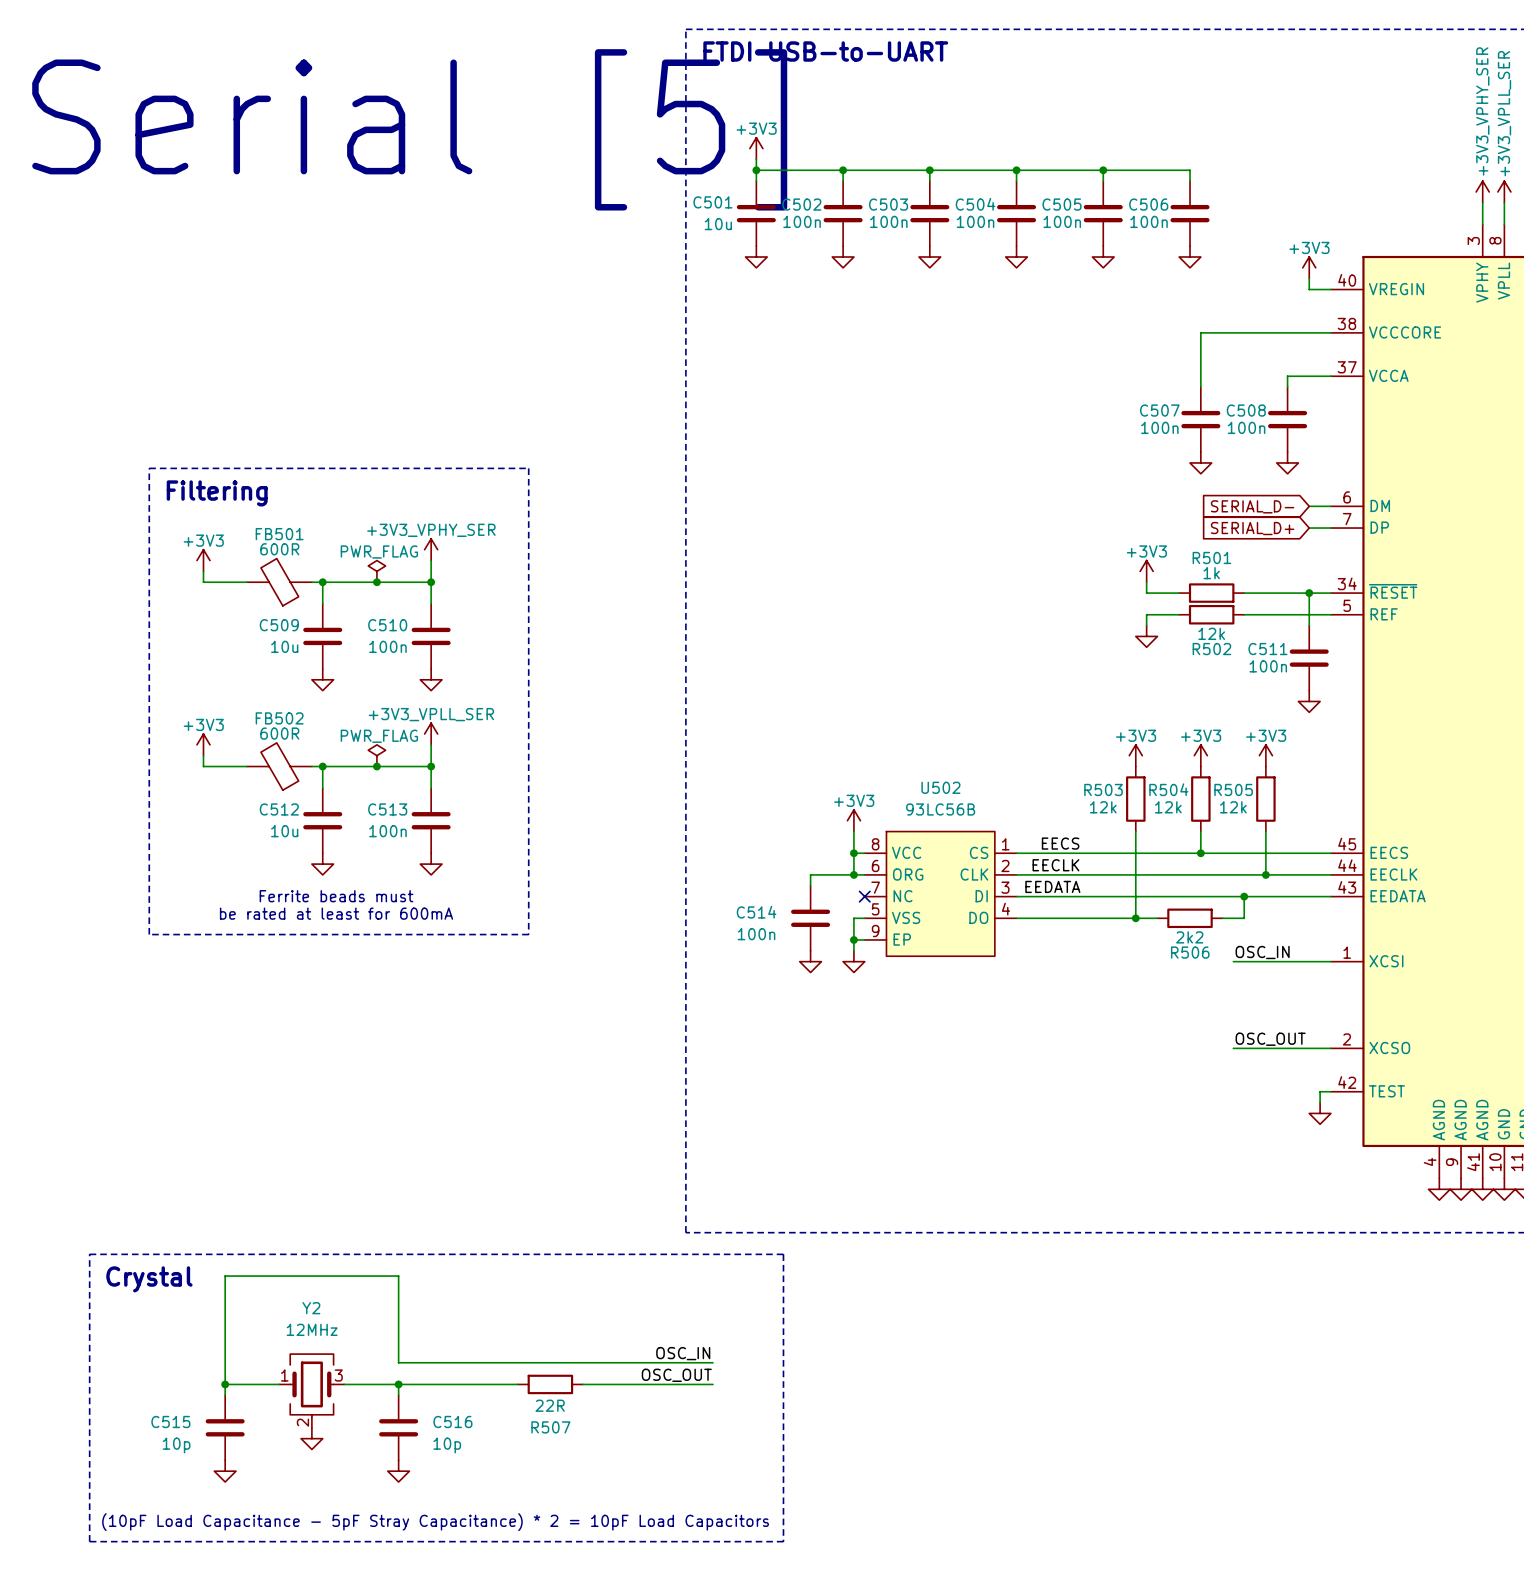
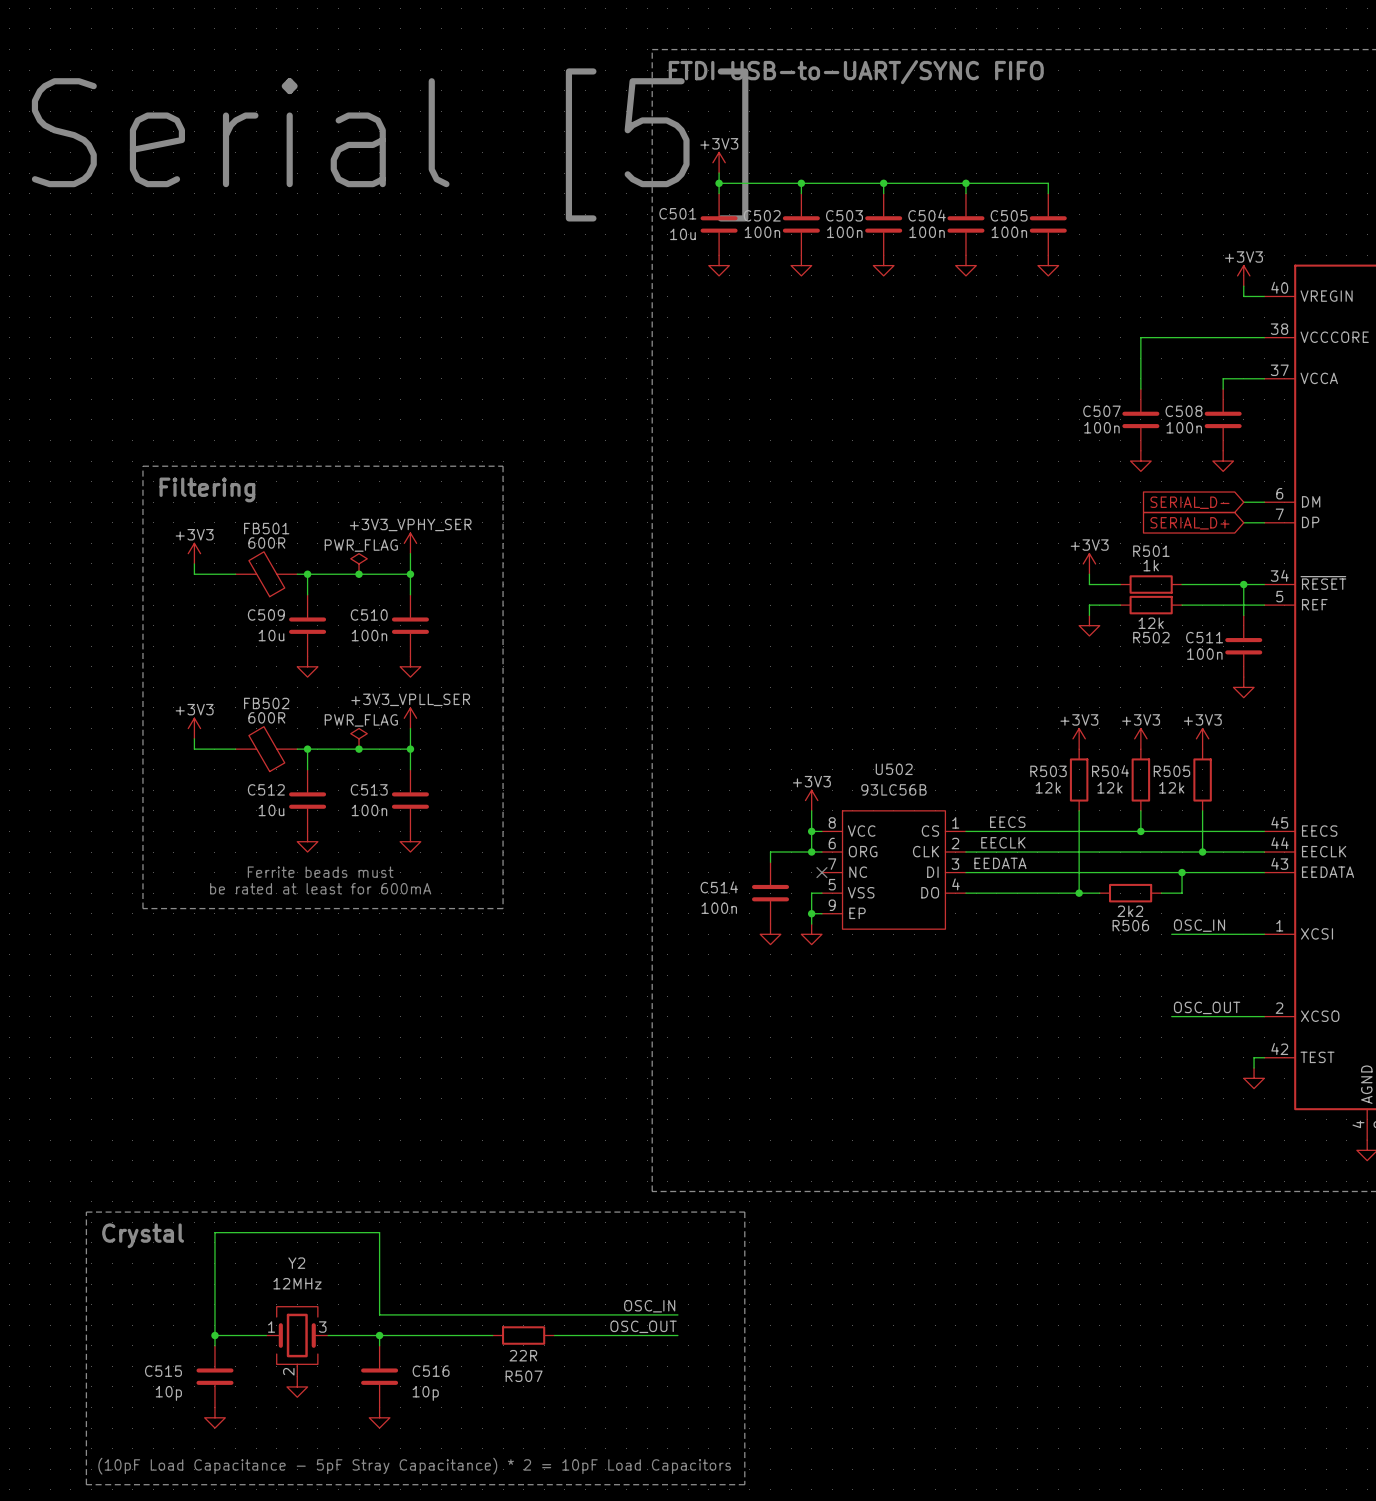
text: FTDI USB-to-UART (825, 51) -> FTDI USB-to-UART/SYNC FIFO (856, 72)
wire: (1103, 170) (1190, 170) (1190, 181) -> none
junction: (1103, 170) -> none
C506: 100n (1190, 213) -> none
power symbol: (1190, 257) -> none

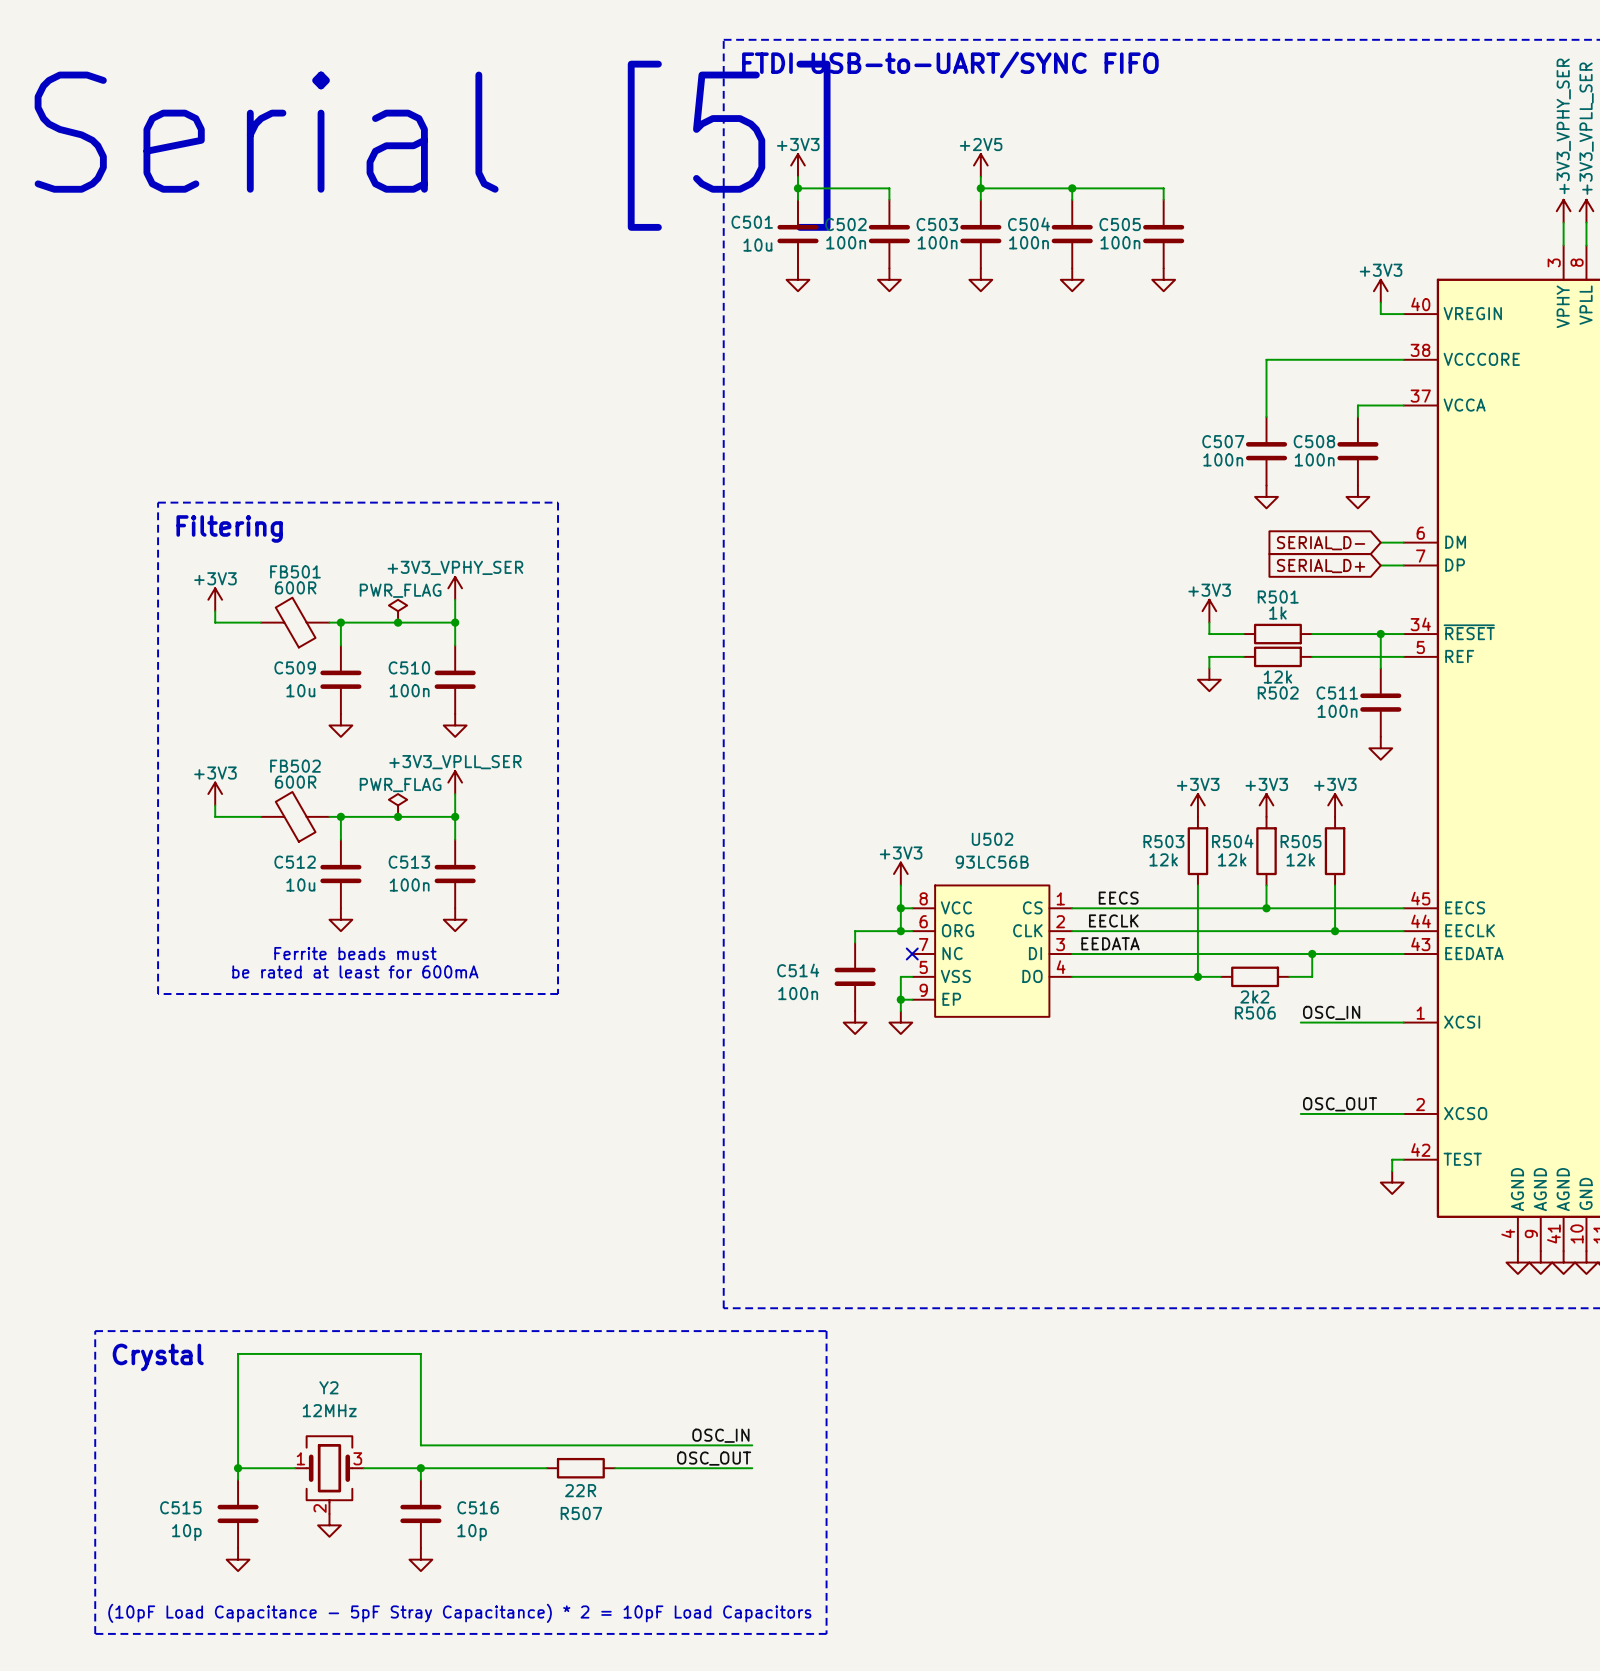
power symbol: none -> +2V5 (980, 165)
wire: (801, 183) (883, 183) -> (980, 176) (980, 188)
junction: (801, 183) -> none

